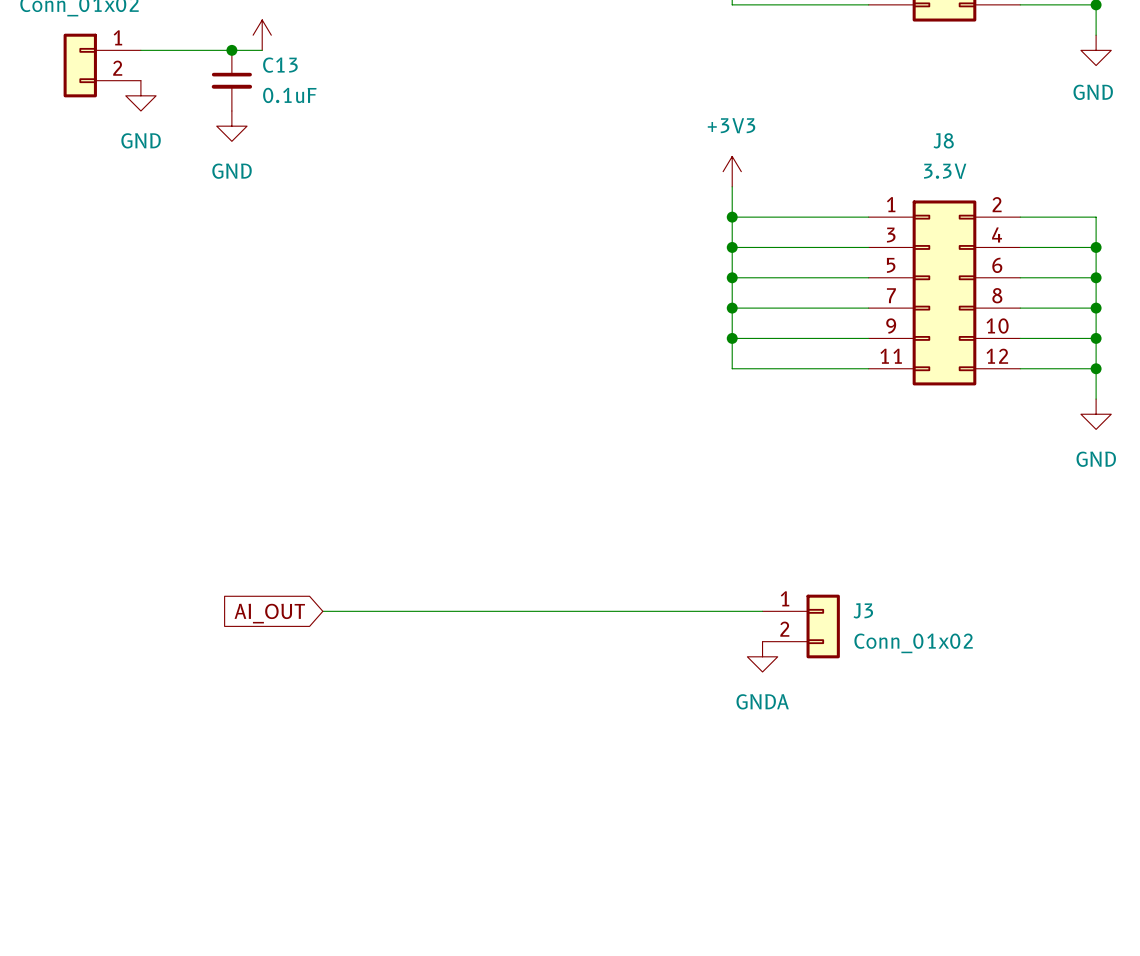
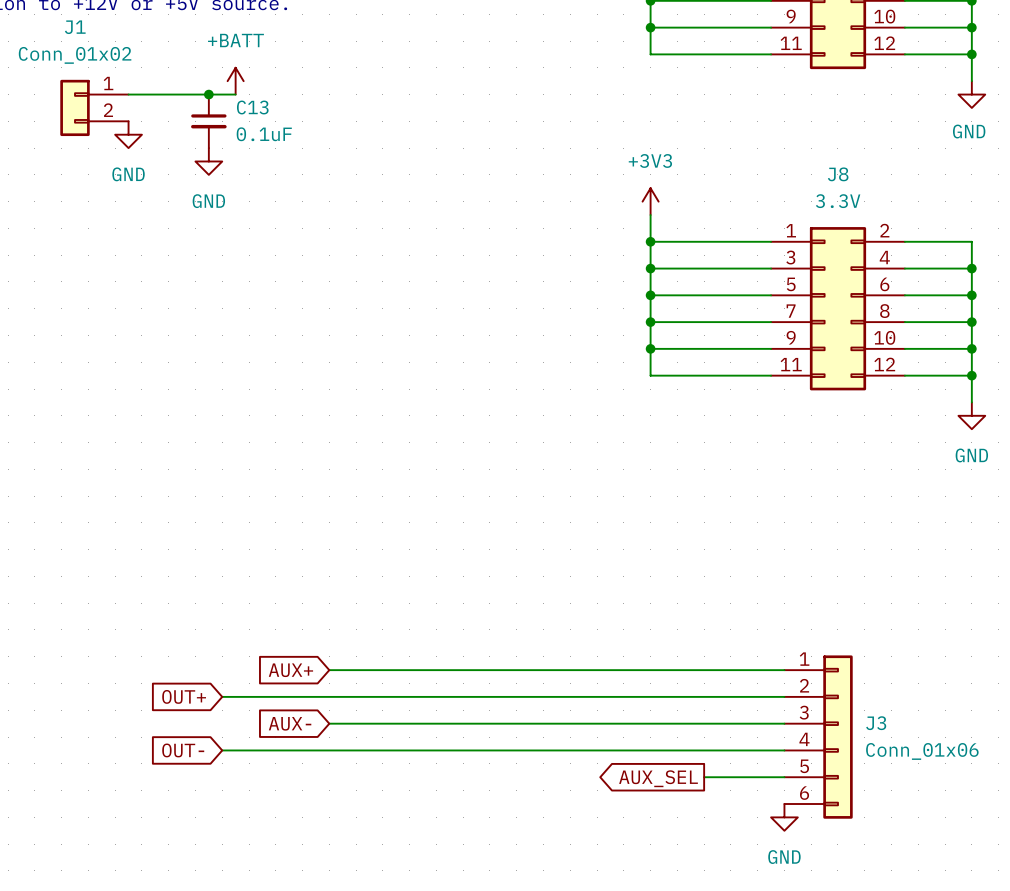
J3 symbol: [762, 594, 840, 659] -> [784, 655, 853, 819]
wire: (322, 611) (762, 611) -> none
global label: AI_OUT (269, 613) -> none
J3 value: Conn_01x02 (913, 643) -> Conn_01x06 (922, 751)
power symbol: GNDA (762, 656) -> none
global label: none -> AUX+ (290, 670)
wire: none -> (329, 670) (784, 670)
global label: none -> OUT+ (184, 696)
wire: none -> (222, 696) (784, 696)
wire: none -> (329, 723) (784, 723)
global label: none -> AUX- (290, 723)
global label: none -> OUT- (183, 750)
wire: none -> (222, 750) (784, 750)
wire: none -> (704, 777) (784, 777)
global label: none -> AUX_SEL (658, 778)
power symbol: none -> GND (784, 817)

